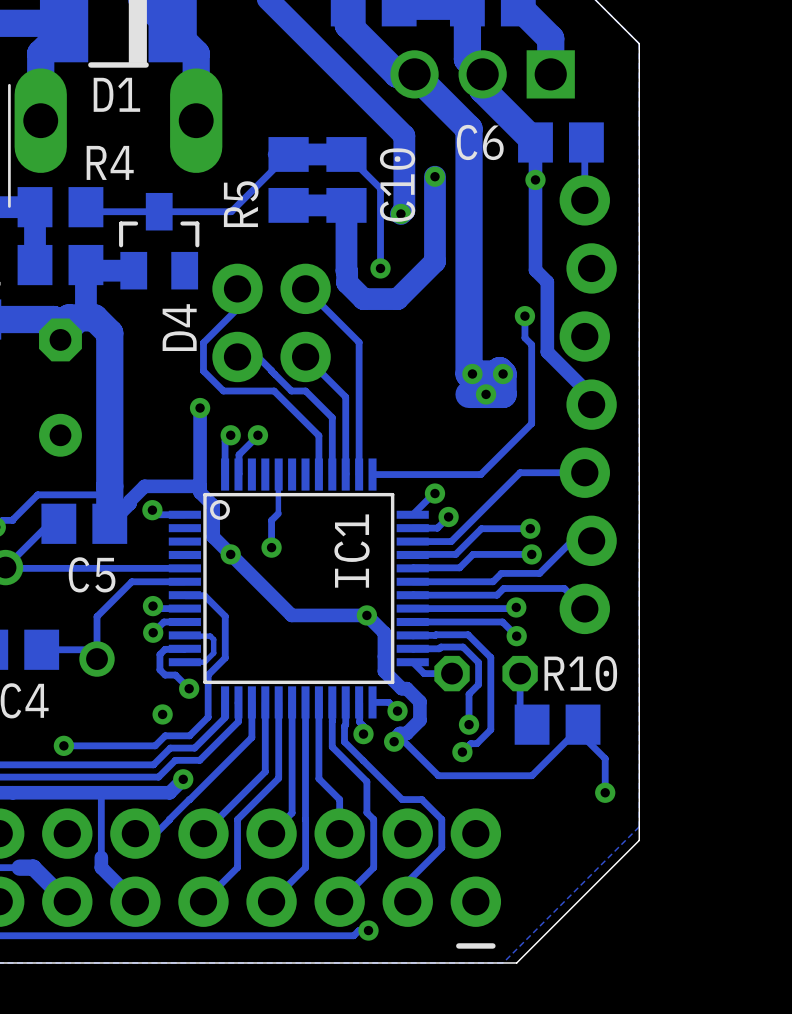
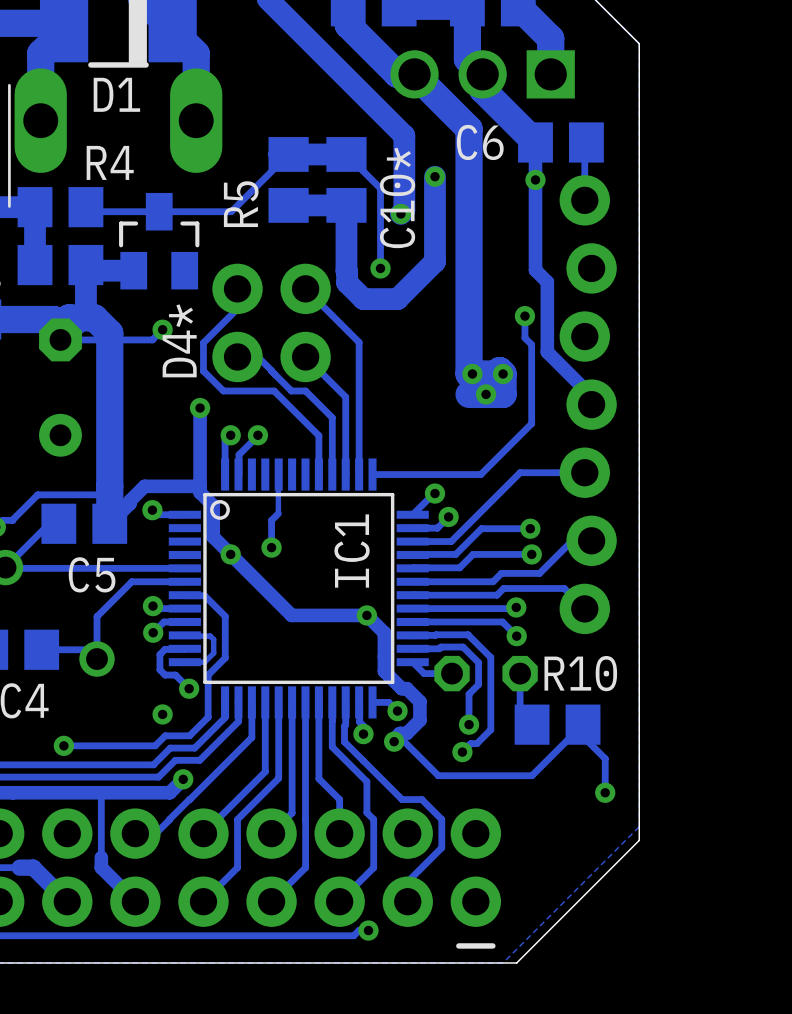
C10 name: C10 (397, 185) -> C10* (397, 197)
D4 name: D4 (179, 327) -> D4* (179, 340)
track: none -> (162, 329) (152, 339) (60, 339)
via: none -> (162, 329)

